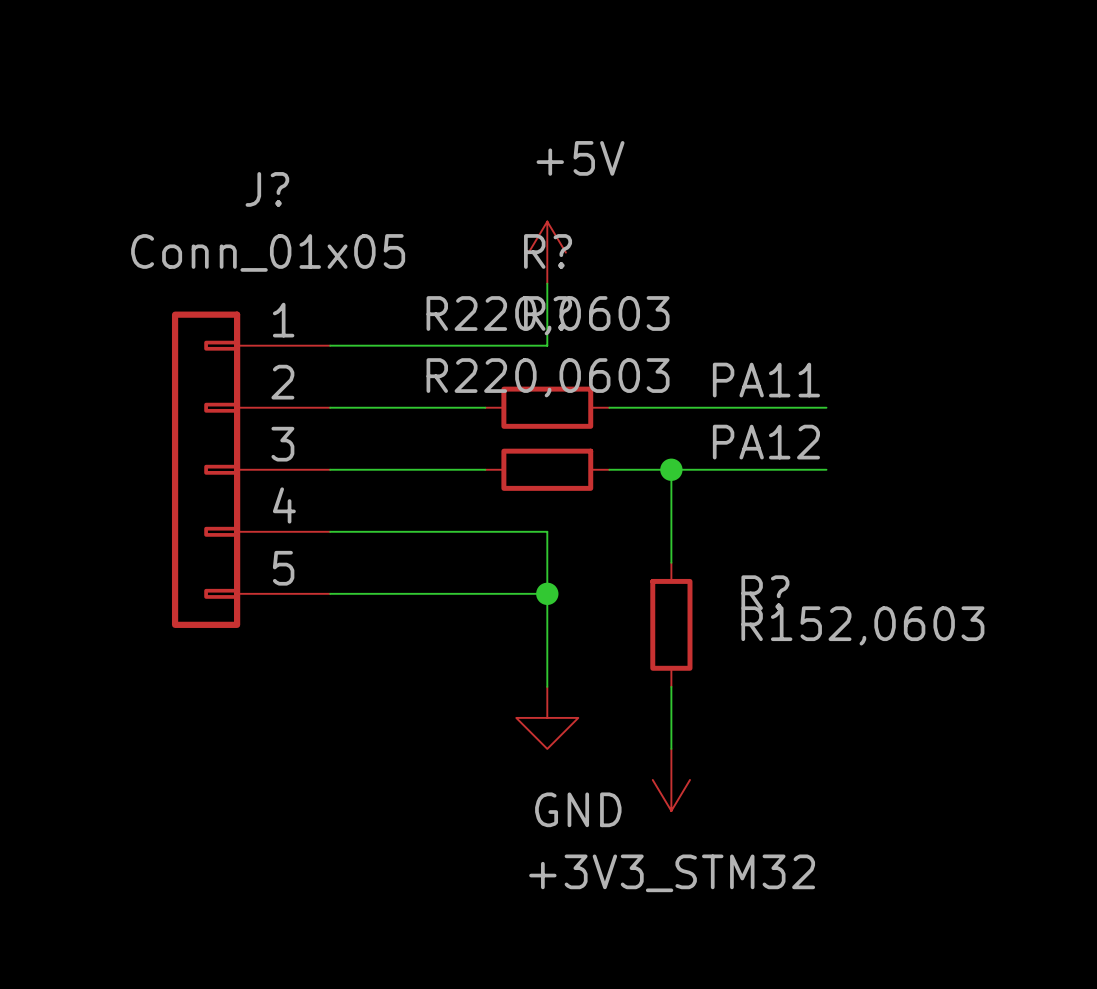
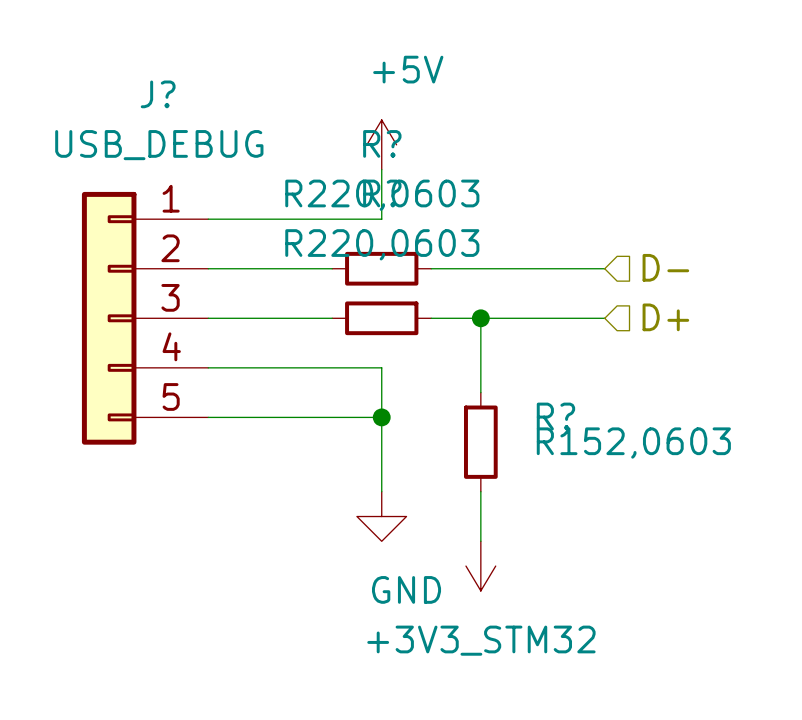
J? value: Conn_01x05 (268, 252) -> USB_DEBUG (159, 145)
label: PA11 (766, 380) -> none
hierarchical label: none -> D- (665, 267)
label: PA12 (766, 442) -> none
hierarchical label: none -> D+ (665, 317)

